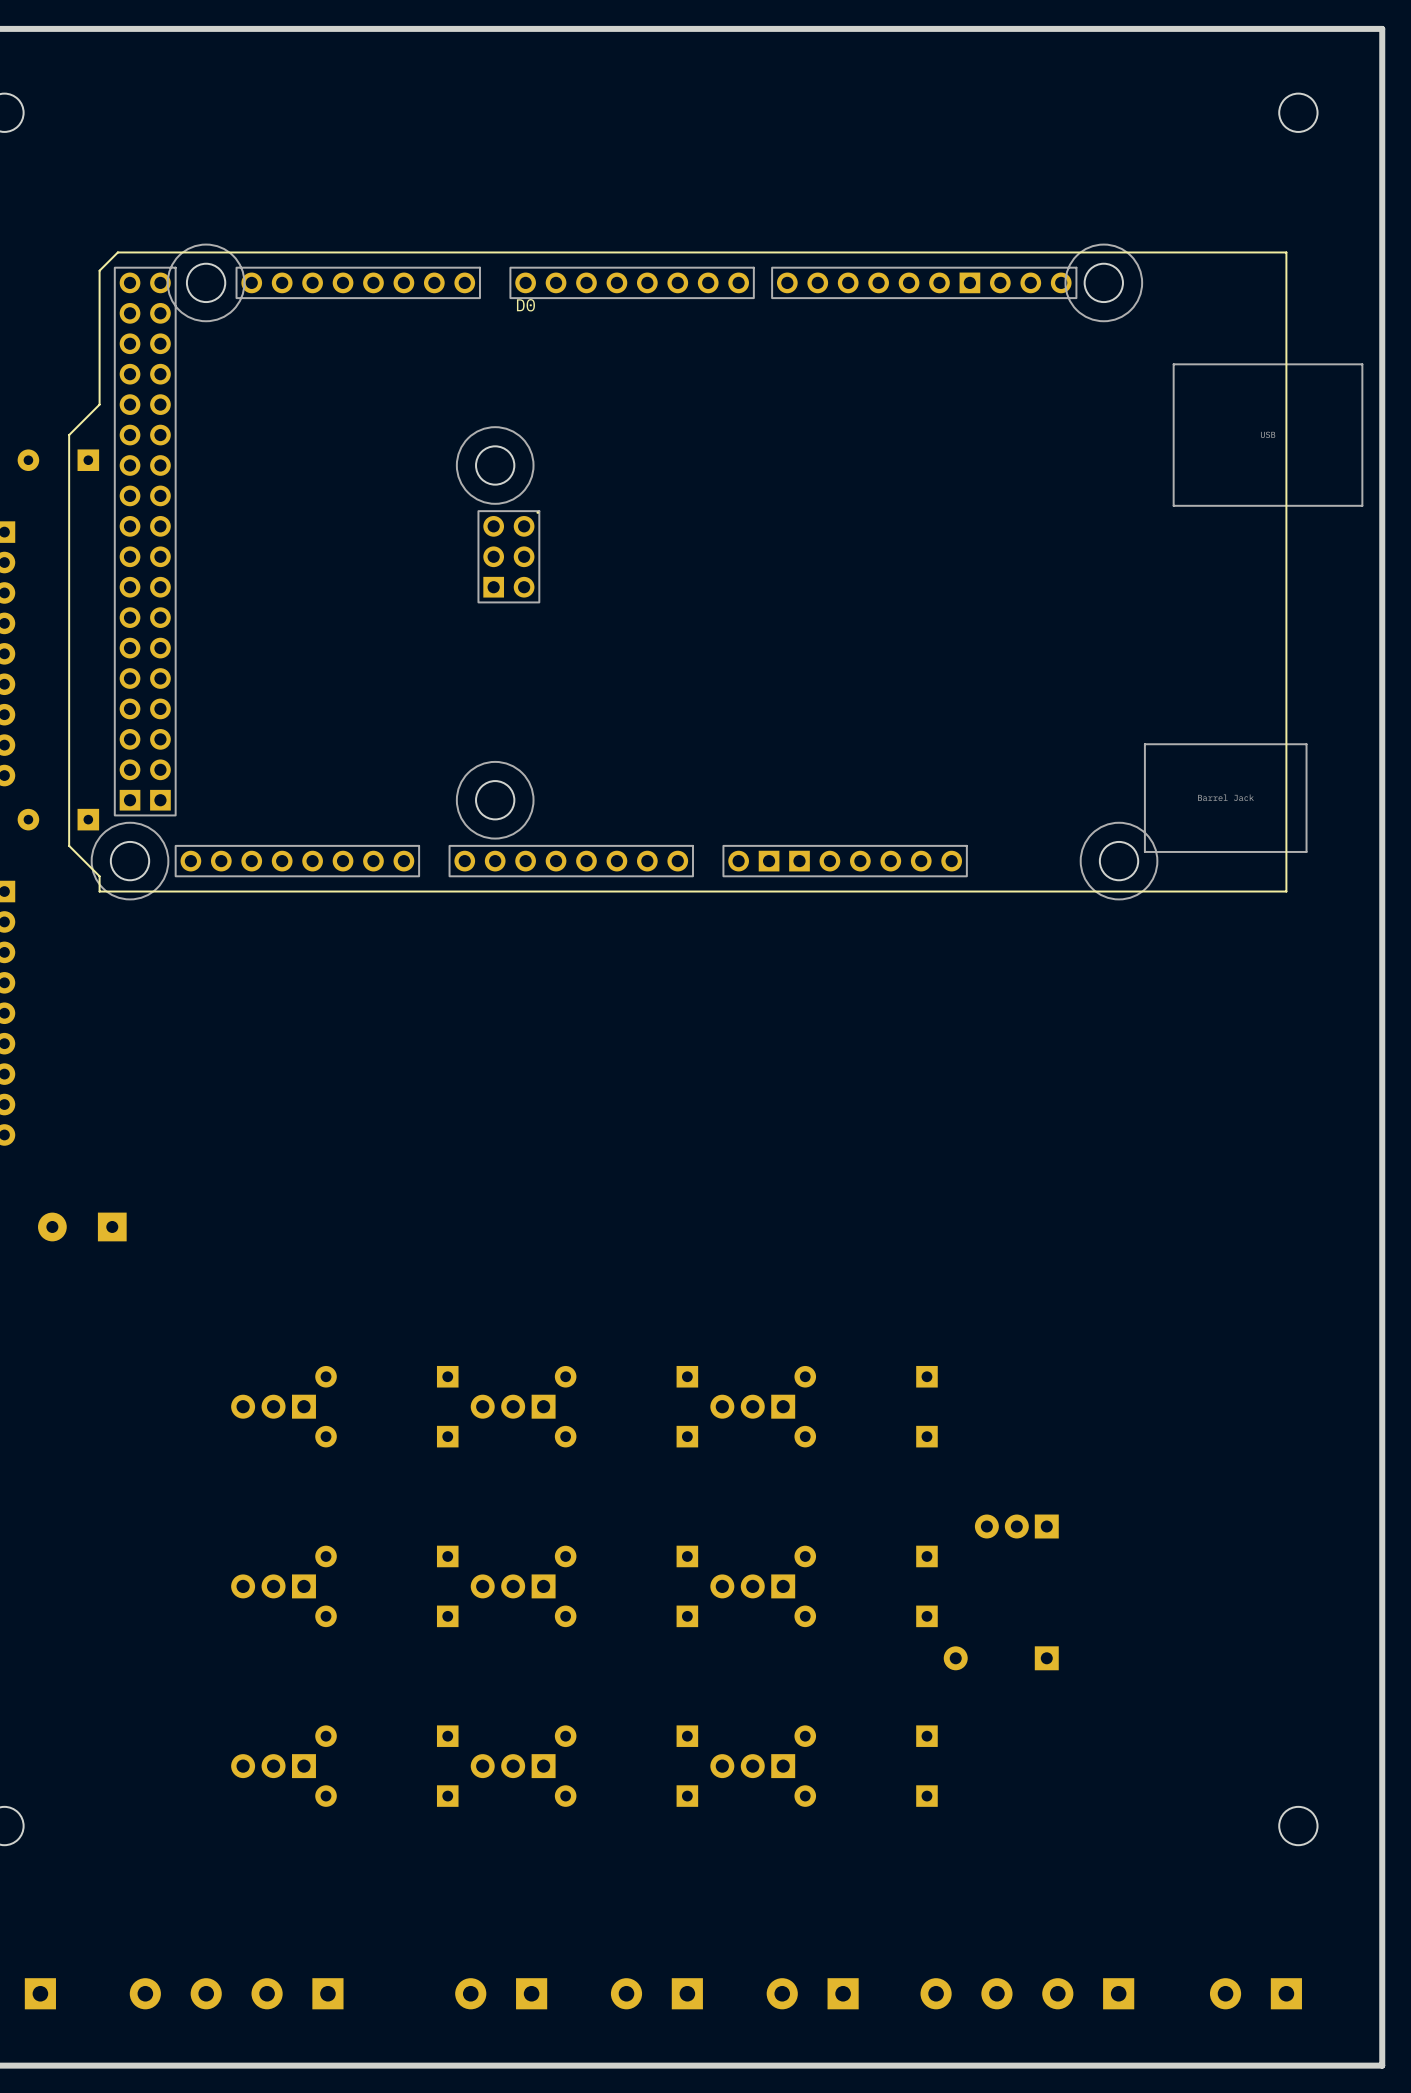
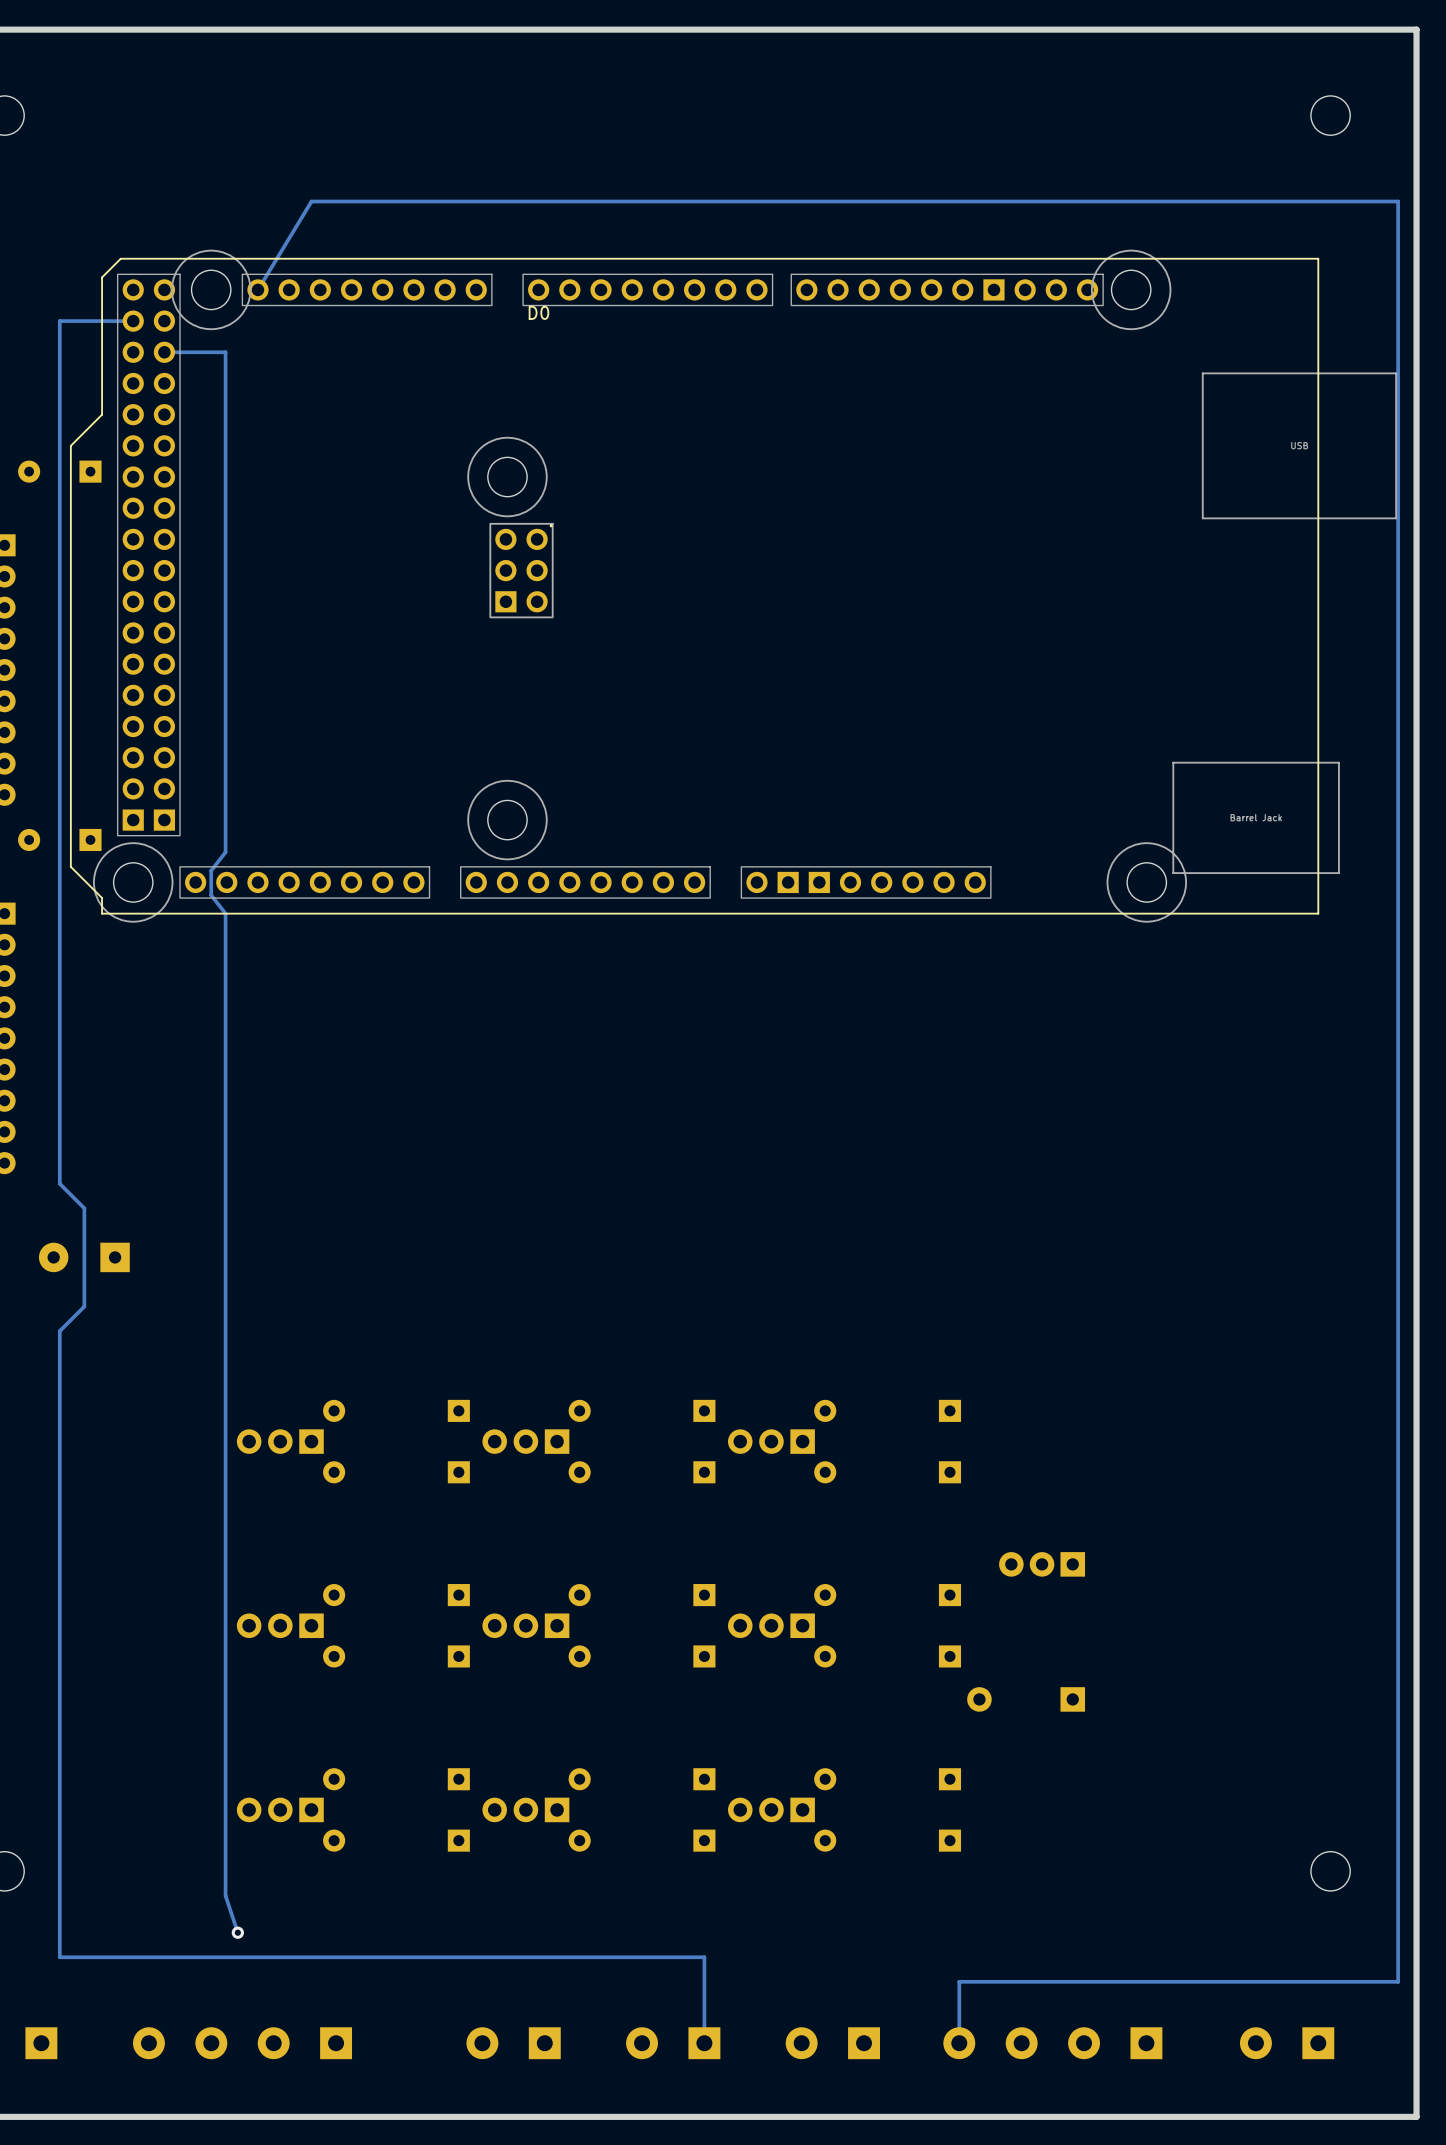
track: none -> (257, 289) (311, 201) (1398, 201) (1398, 1981) (959, 1981) (959, 2043)
track: none -> (133, 321) (59, 321) (59, 1183) (84, 1208) (84, 1306) (59, 1331) (59, 1957) (704, 1957) (704, 2043)
track: none -> (164, 352) (225, 352) (225, 852) (211, 870) (211, 895) (225, 913) (225, 1895) (237, 1932)
via: none -> (237, 1932)

